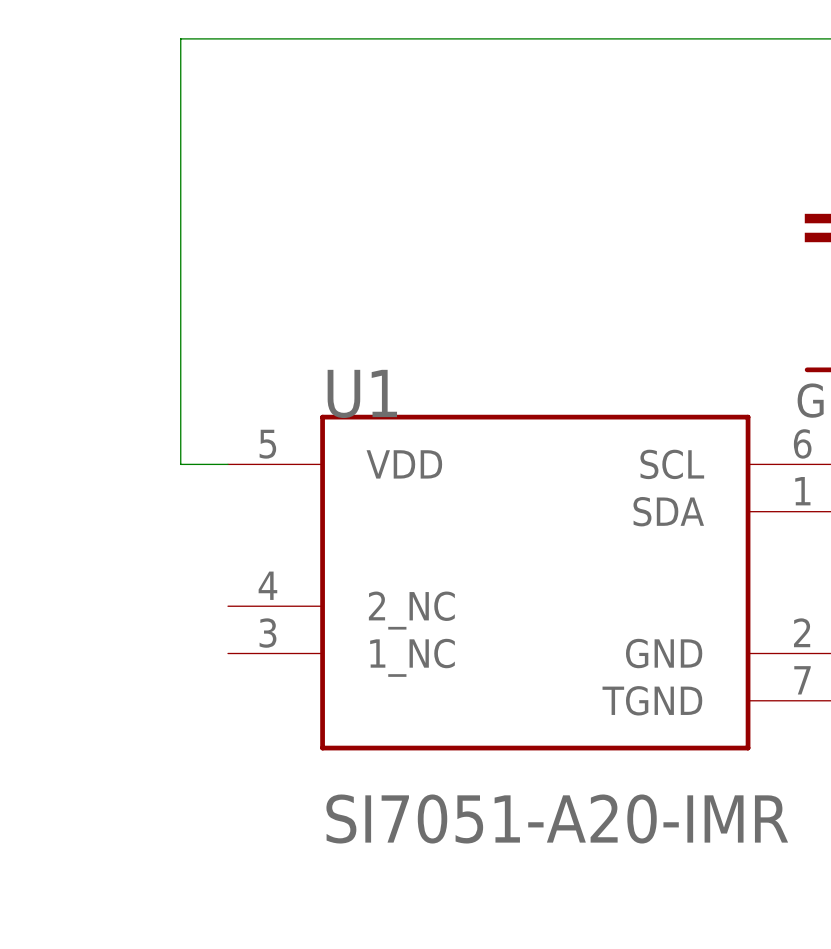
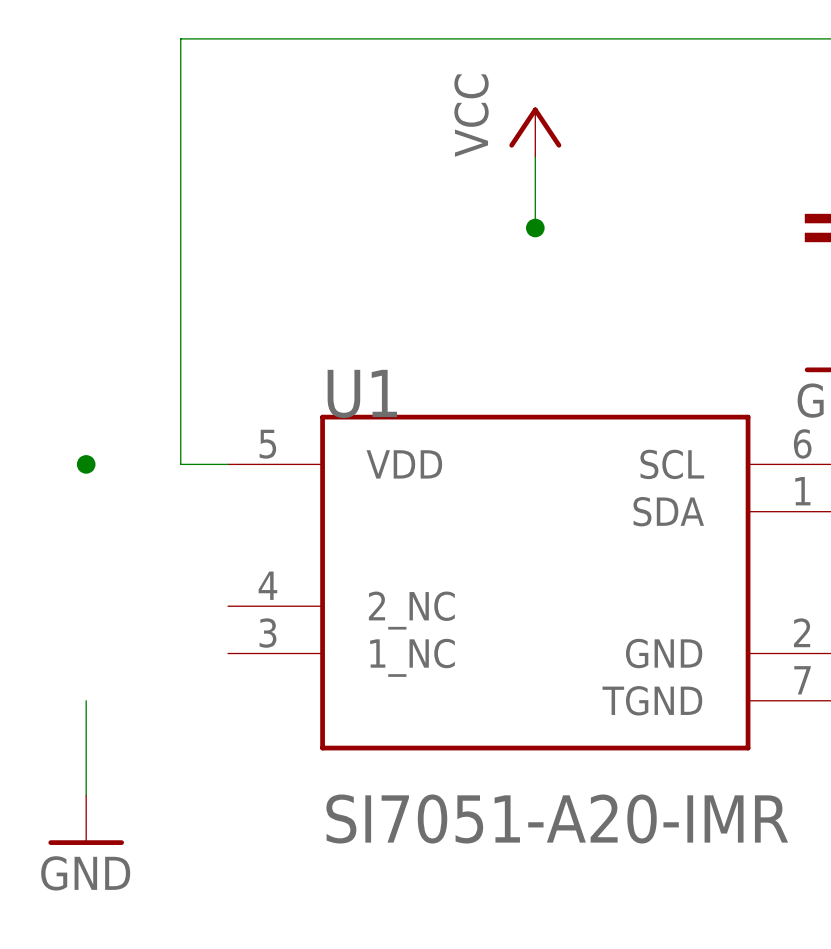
power symbol: none -> VCC (535, 132)
wire: none -> (535, 157) (535, 228)
junction: none -> (535, 228)
junction: none -> (86, 464)
wire: none -> (86, 700) (86, 795)
power symbol: none -> GND (86, 820)

